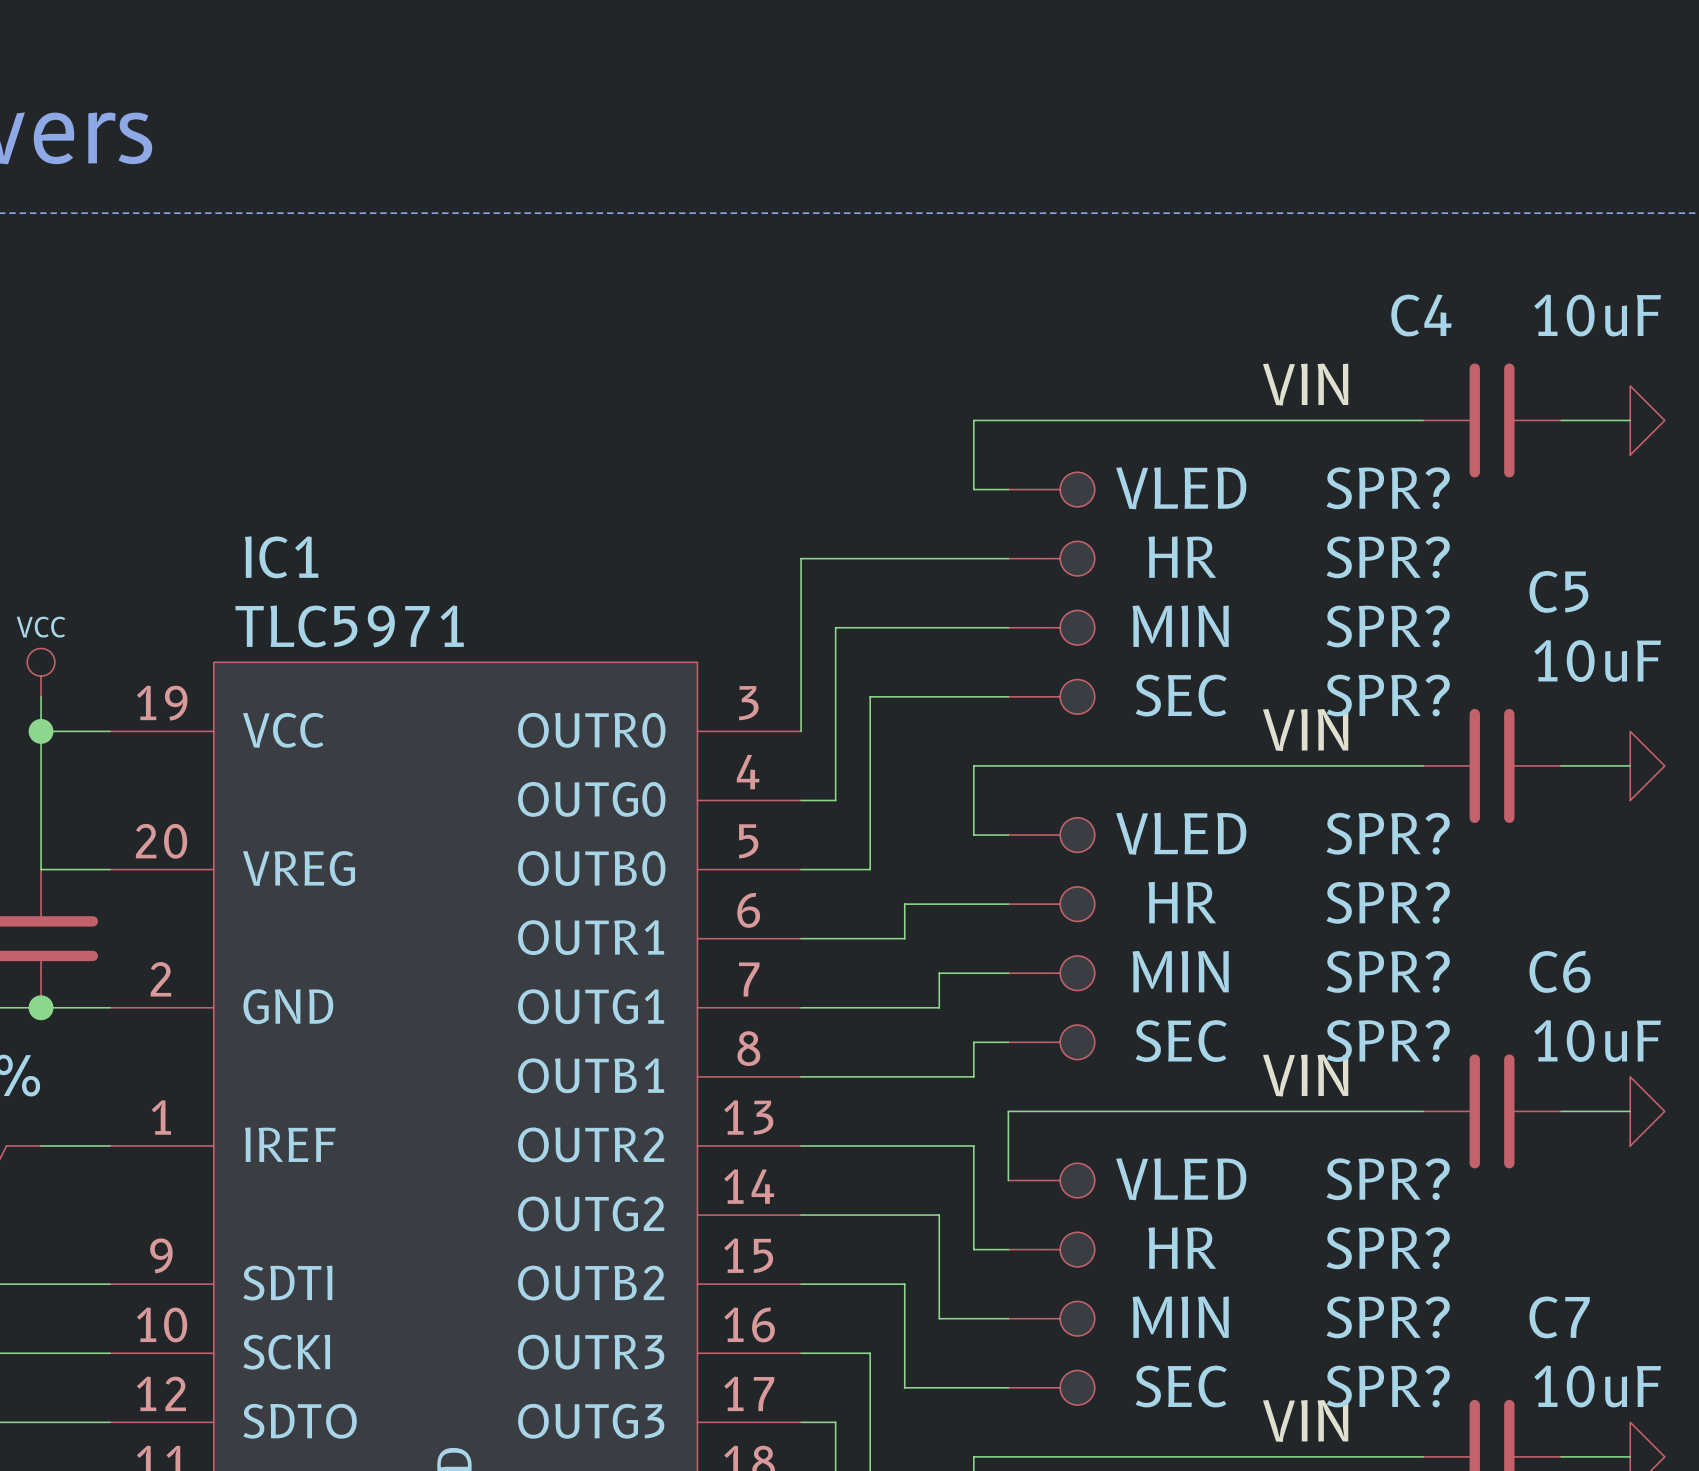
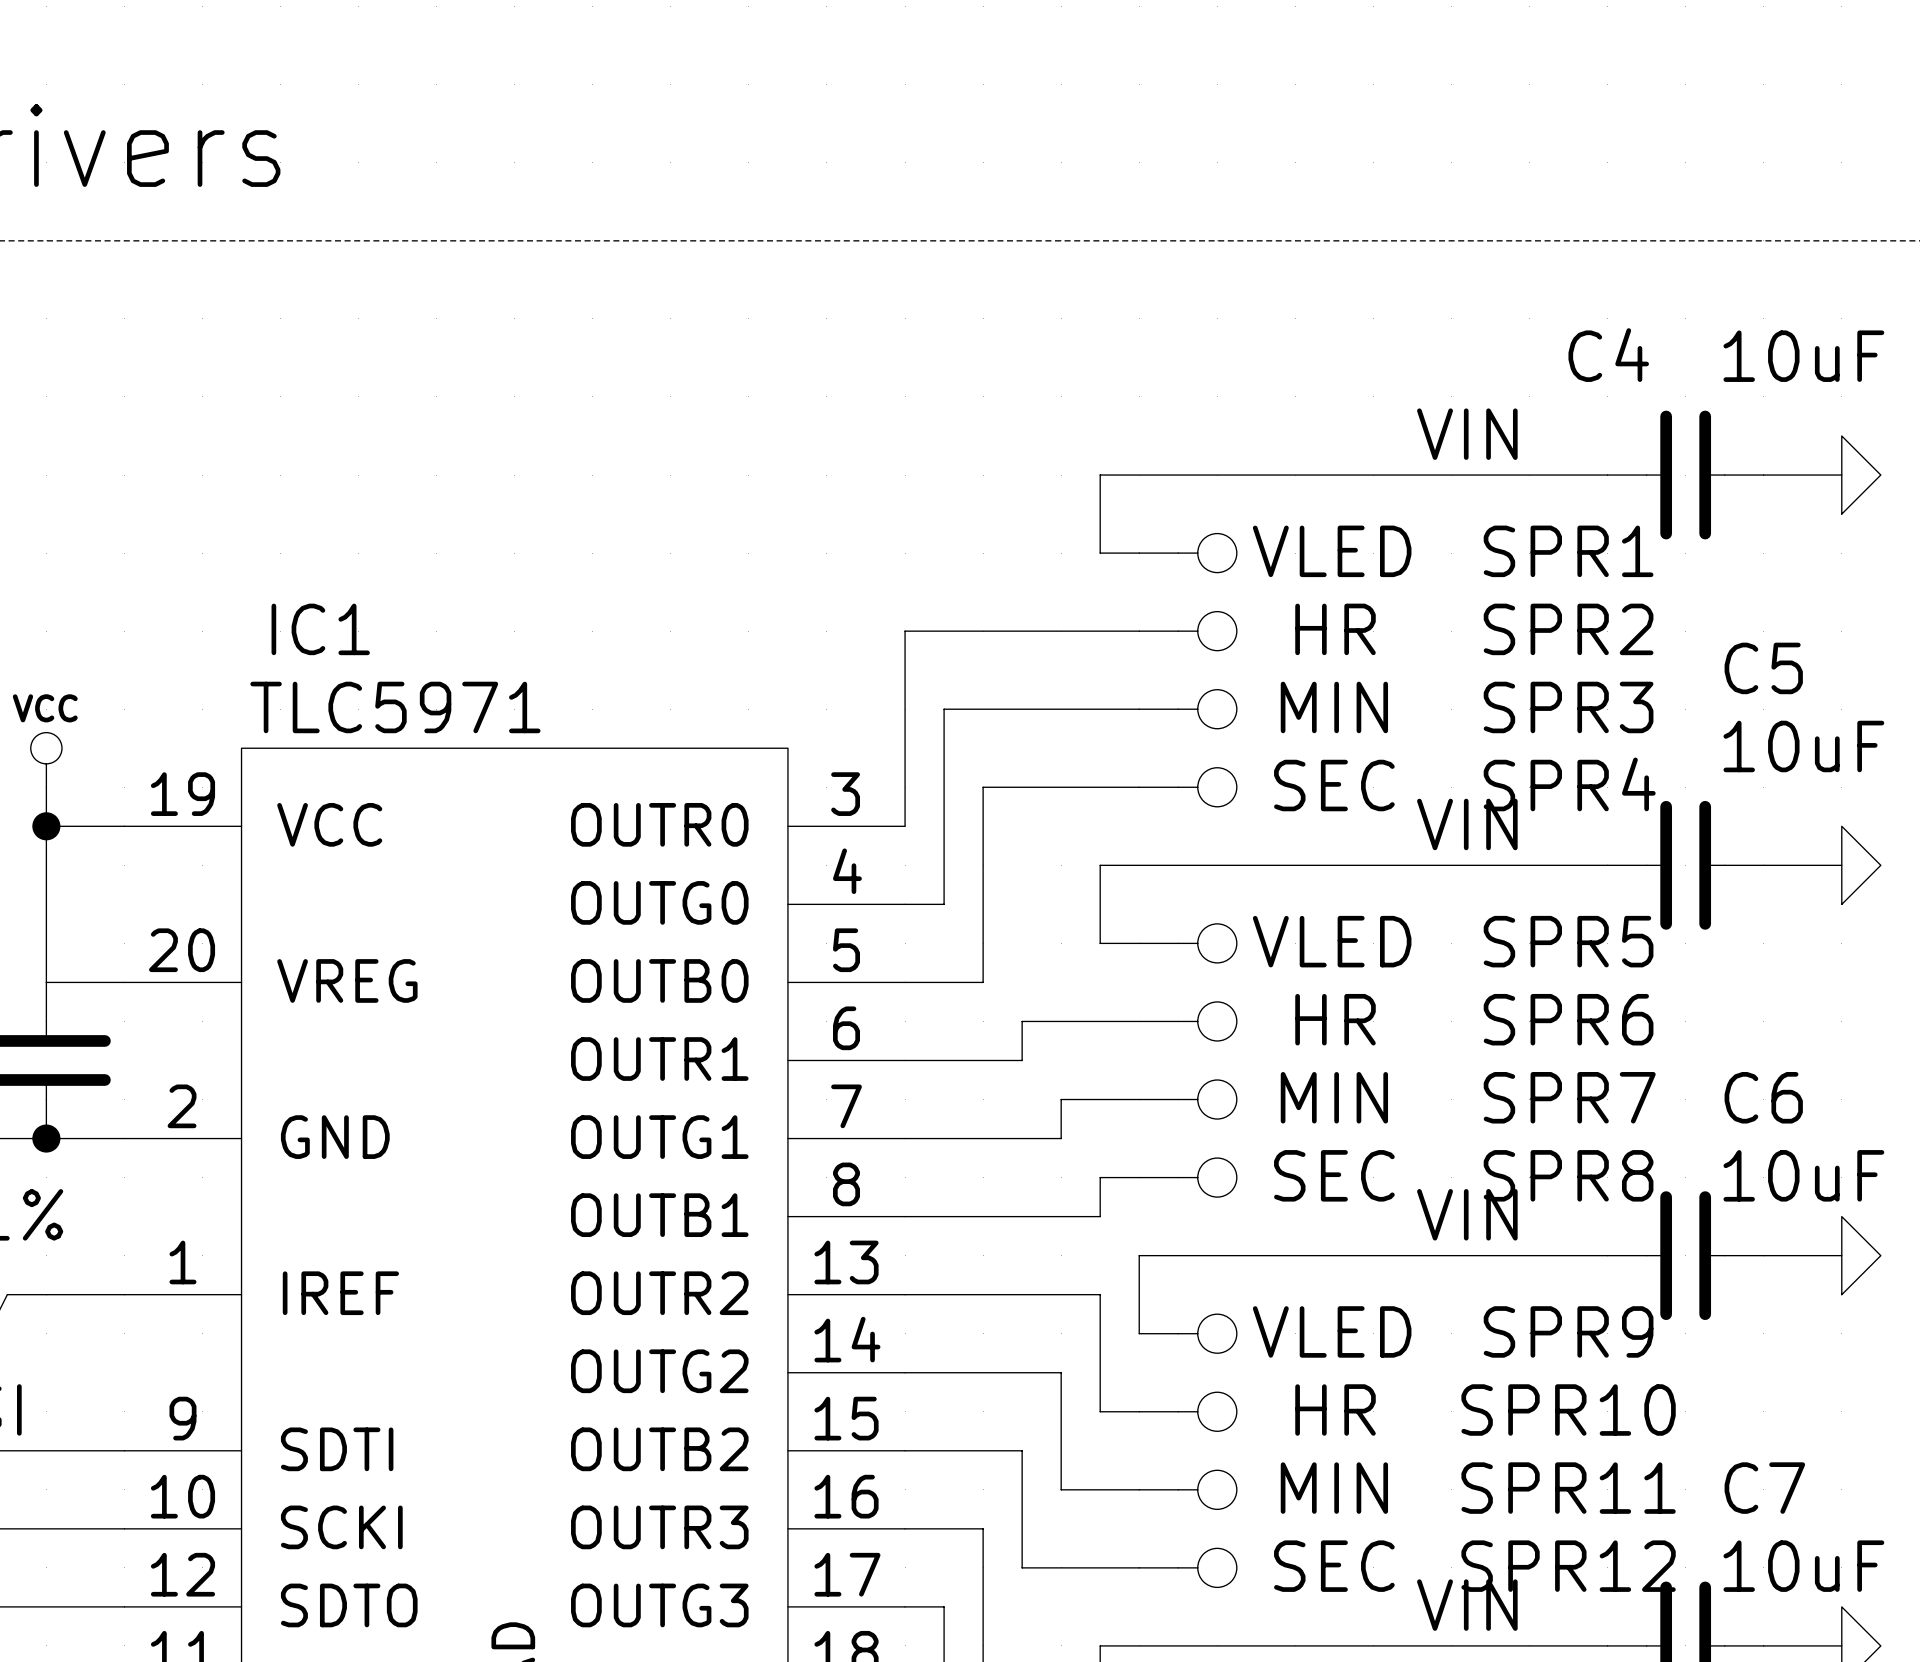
SPR? name: SPR? (1388, 488) -> SPR1 (1568, 551)
SPR? name: SPR? (1388, 557) -> SPR2 (1568, 629)
SPR? name: SPR? (1388, 626) -> SPR3 (1568, 707)
SPR? name: SPR? (1388, 695) -> SPR4 (1569, 784)
SPR? name: SPR? (1388, 833) -> SPR5 (1568, 941)
SPR? name: SPR? (1388, 902) -> SPR6 (1568, 1019)
SPR? name: SPR? (1388, 971) -> SPR7 (1569, 1097)
SPR? name: SPR? (1388, 1041) -> SPR8 (1568, 1175)
SPR? name: SPR? (1388, 1179) -> SPR9 (1568, 1331)
SPR? name: SPR? (1388, 1248) -> SPR10 (1568, 1410)
SPR? name: SPR? (1388, 1317) -> SPR11 (1568, 1488)
SPR? name: SPR? (1388, 1386) -> SPR12 (1568, 1566)

